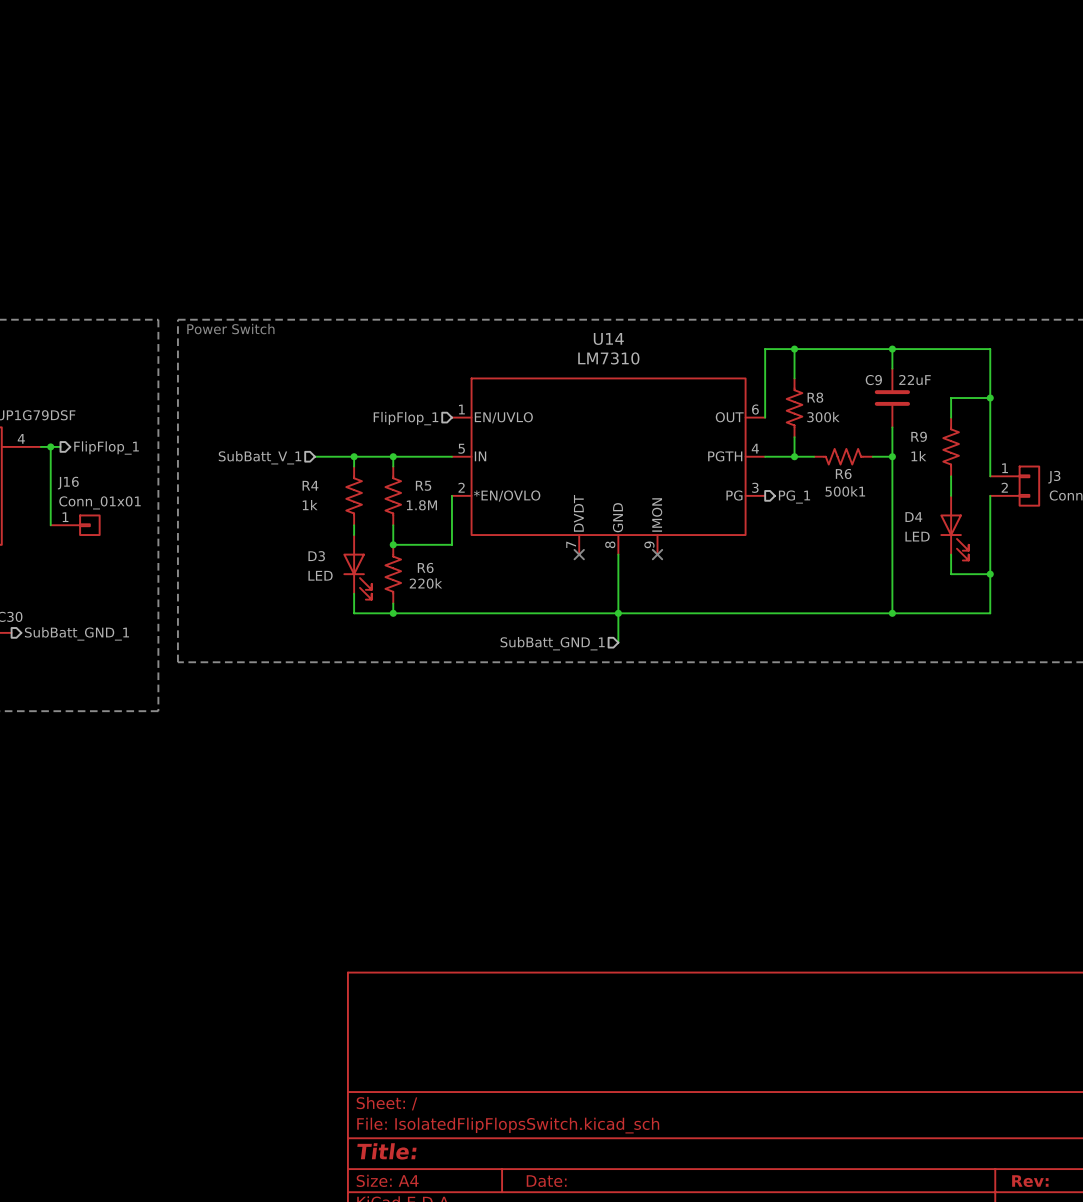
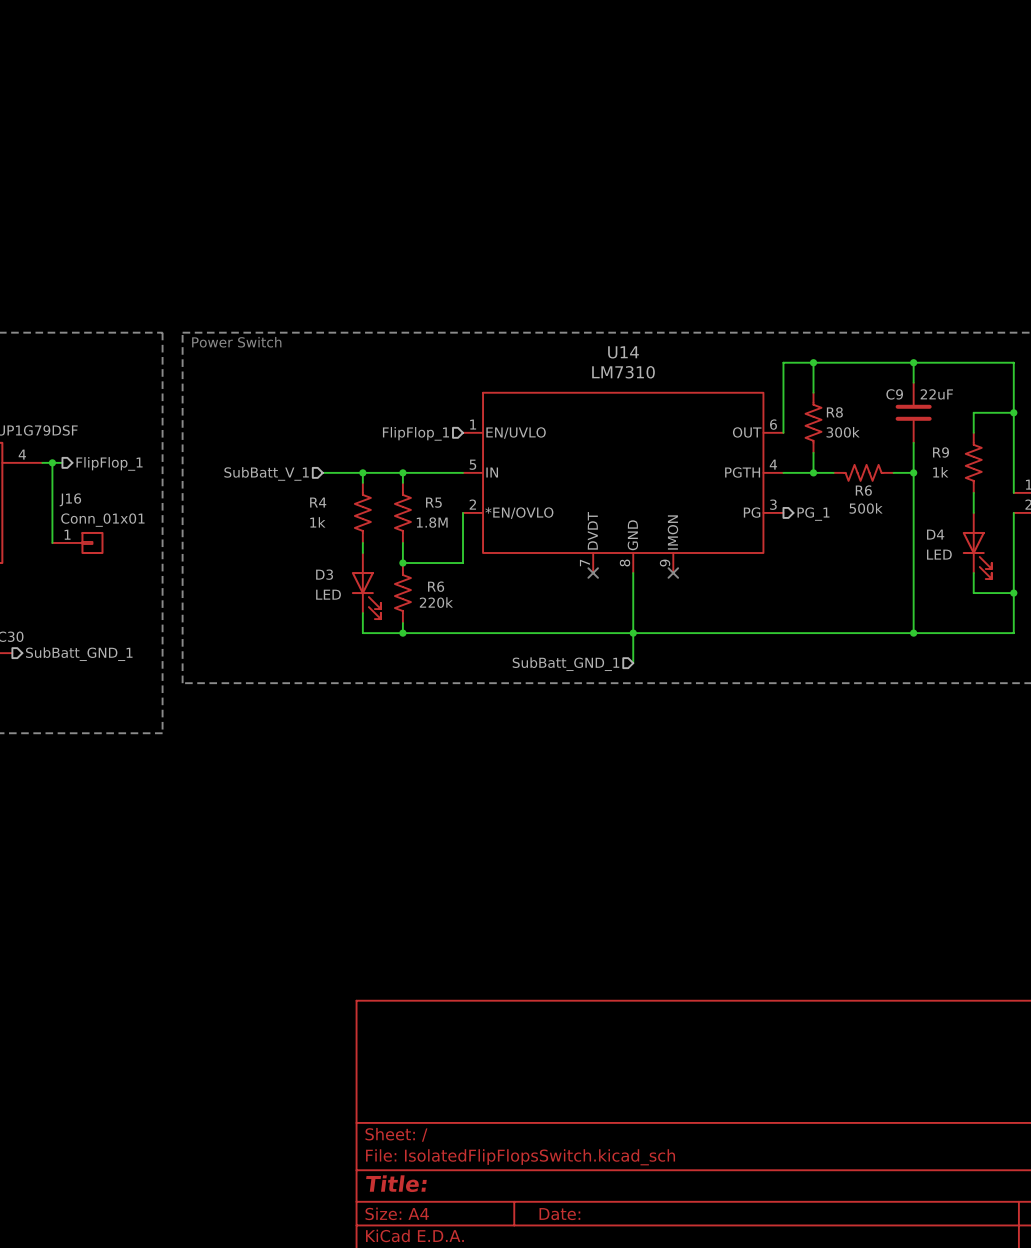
500k1 name: 500k1 (845, 491) -> 500k (866, 508)

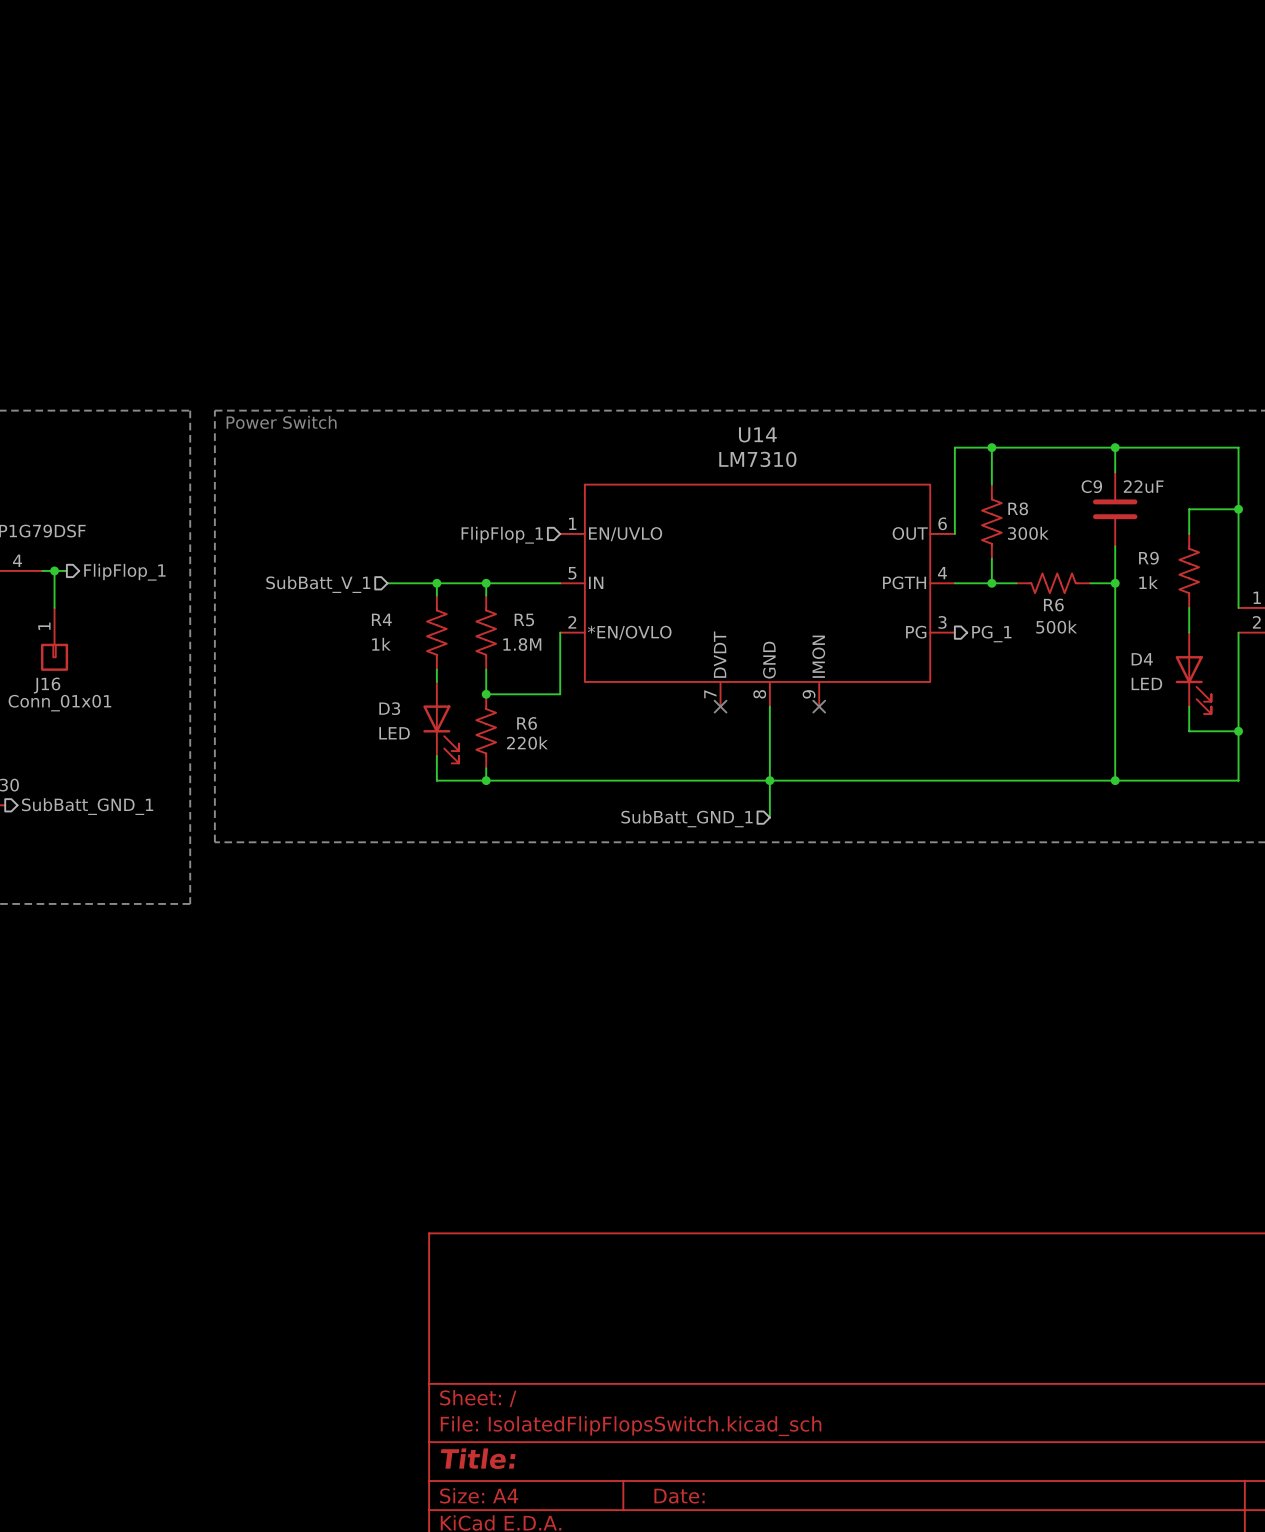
J16 name position: J16 (70, 499) -> J16 (47, 685)
J16 value position: Conn_01x01 (102, 520) -> Conn_01x01 (59, 703)
J16 position: (77, 542) -> (54, 639)
J16 rotation: 0° (92, 542) -> 90° clockwise (54, 657)

